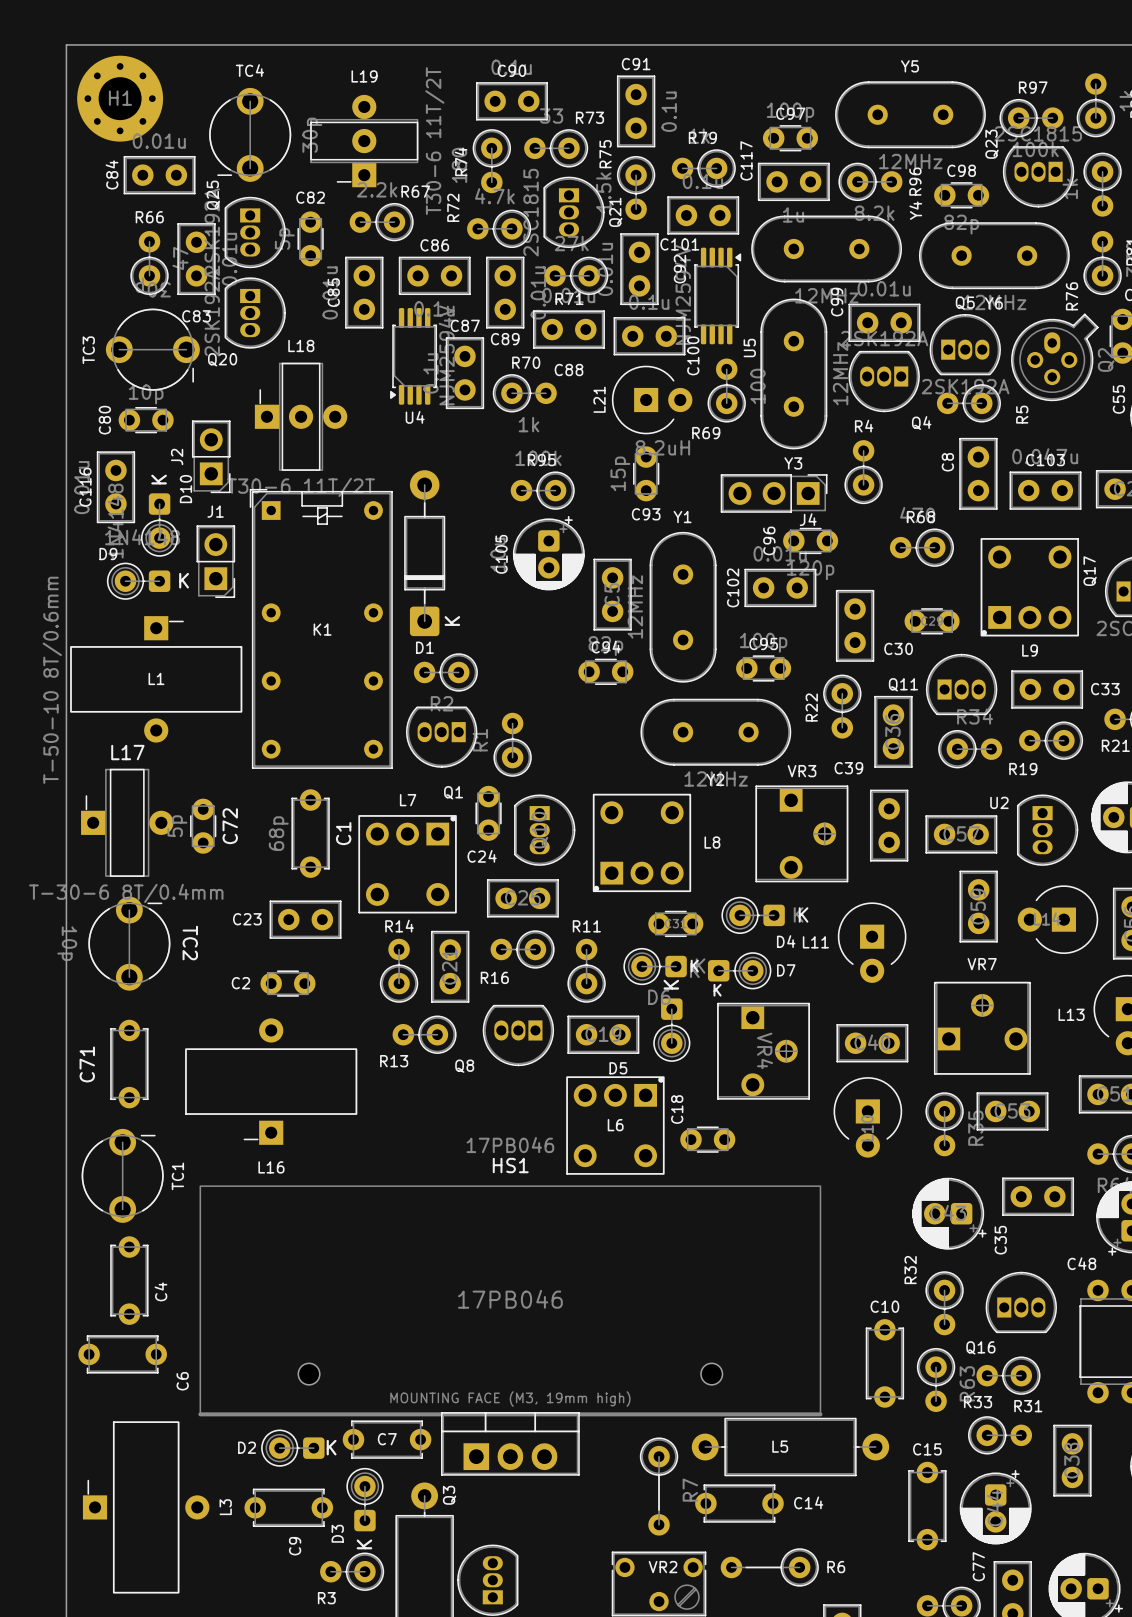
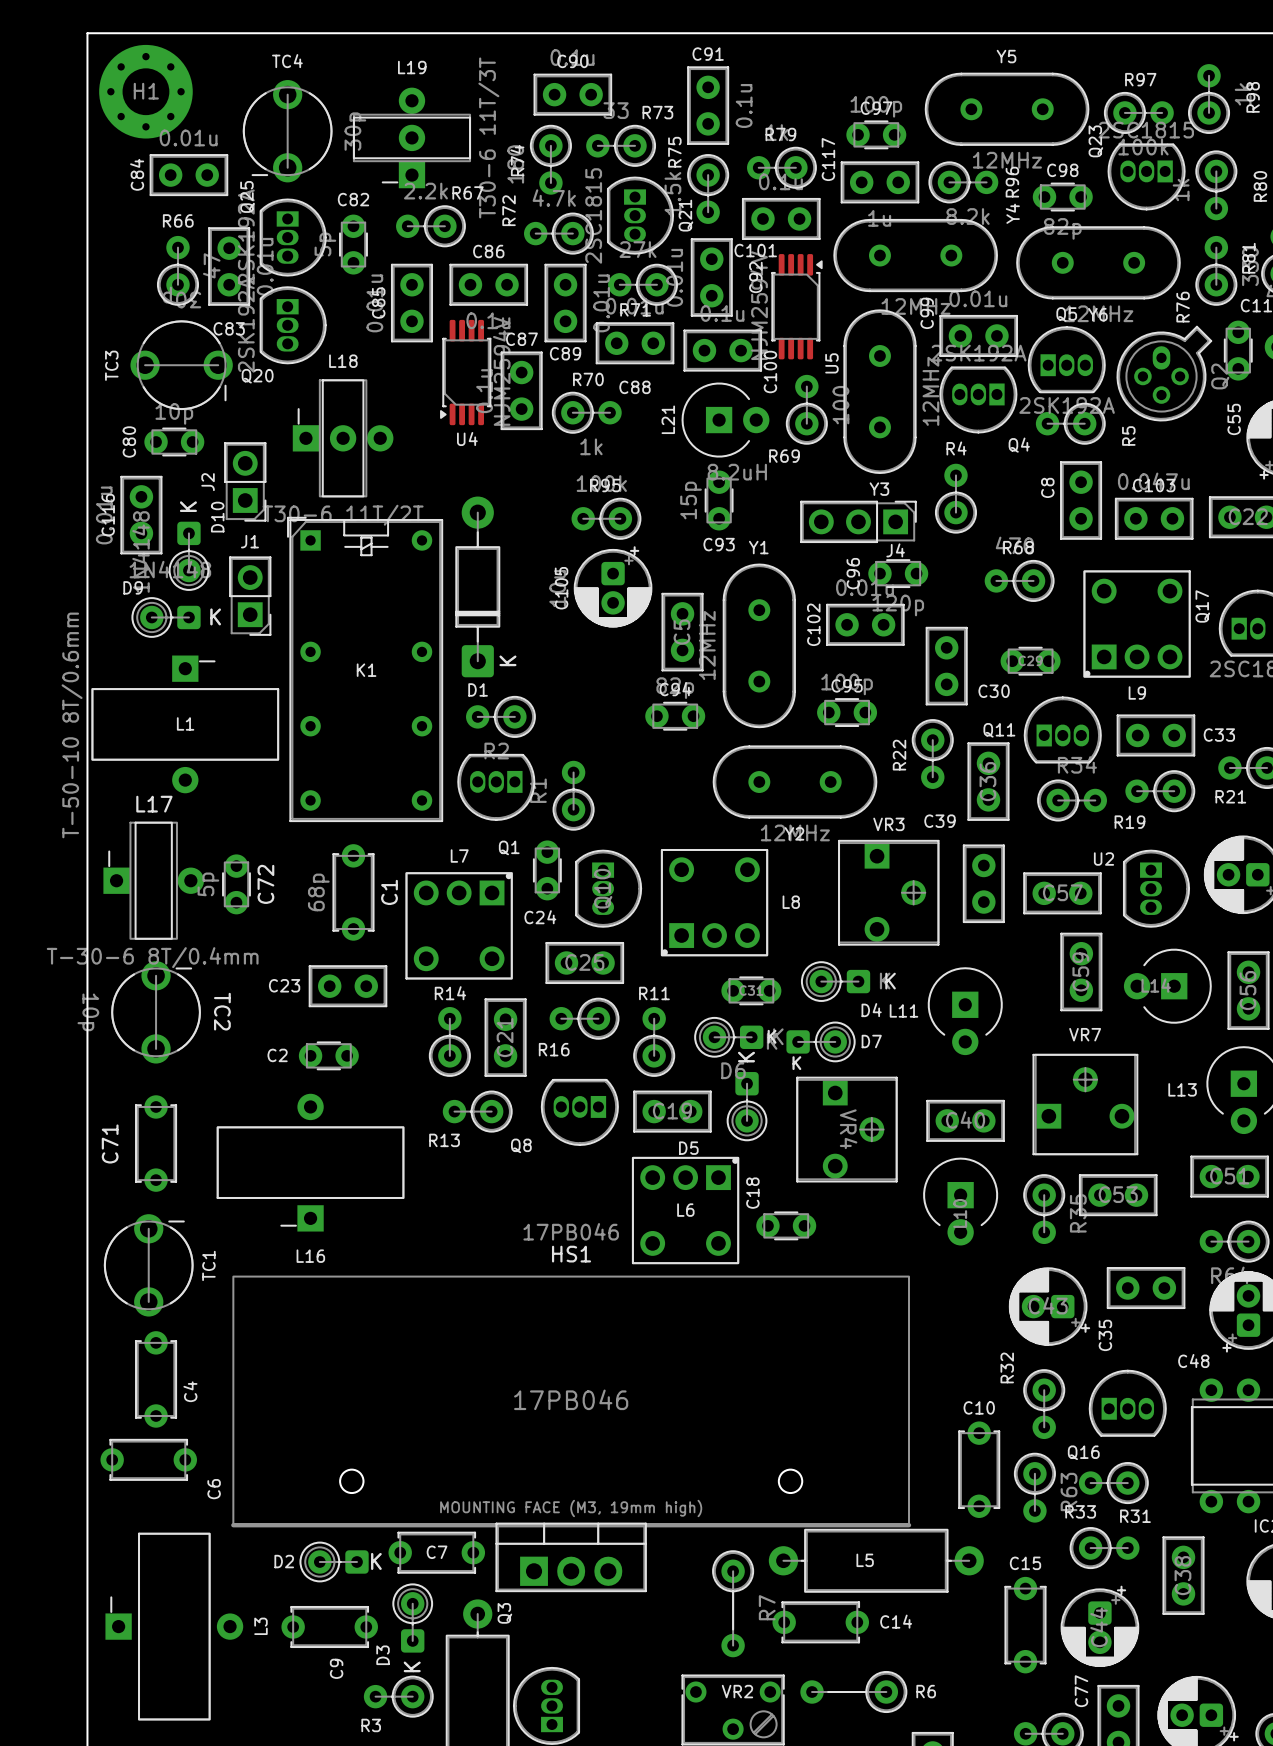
L19 value: T30-6 11T/2T (434, 141) -> T30-6 11T/3T (488, 137)

